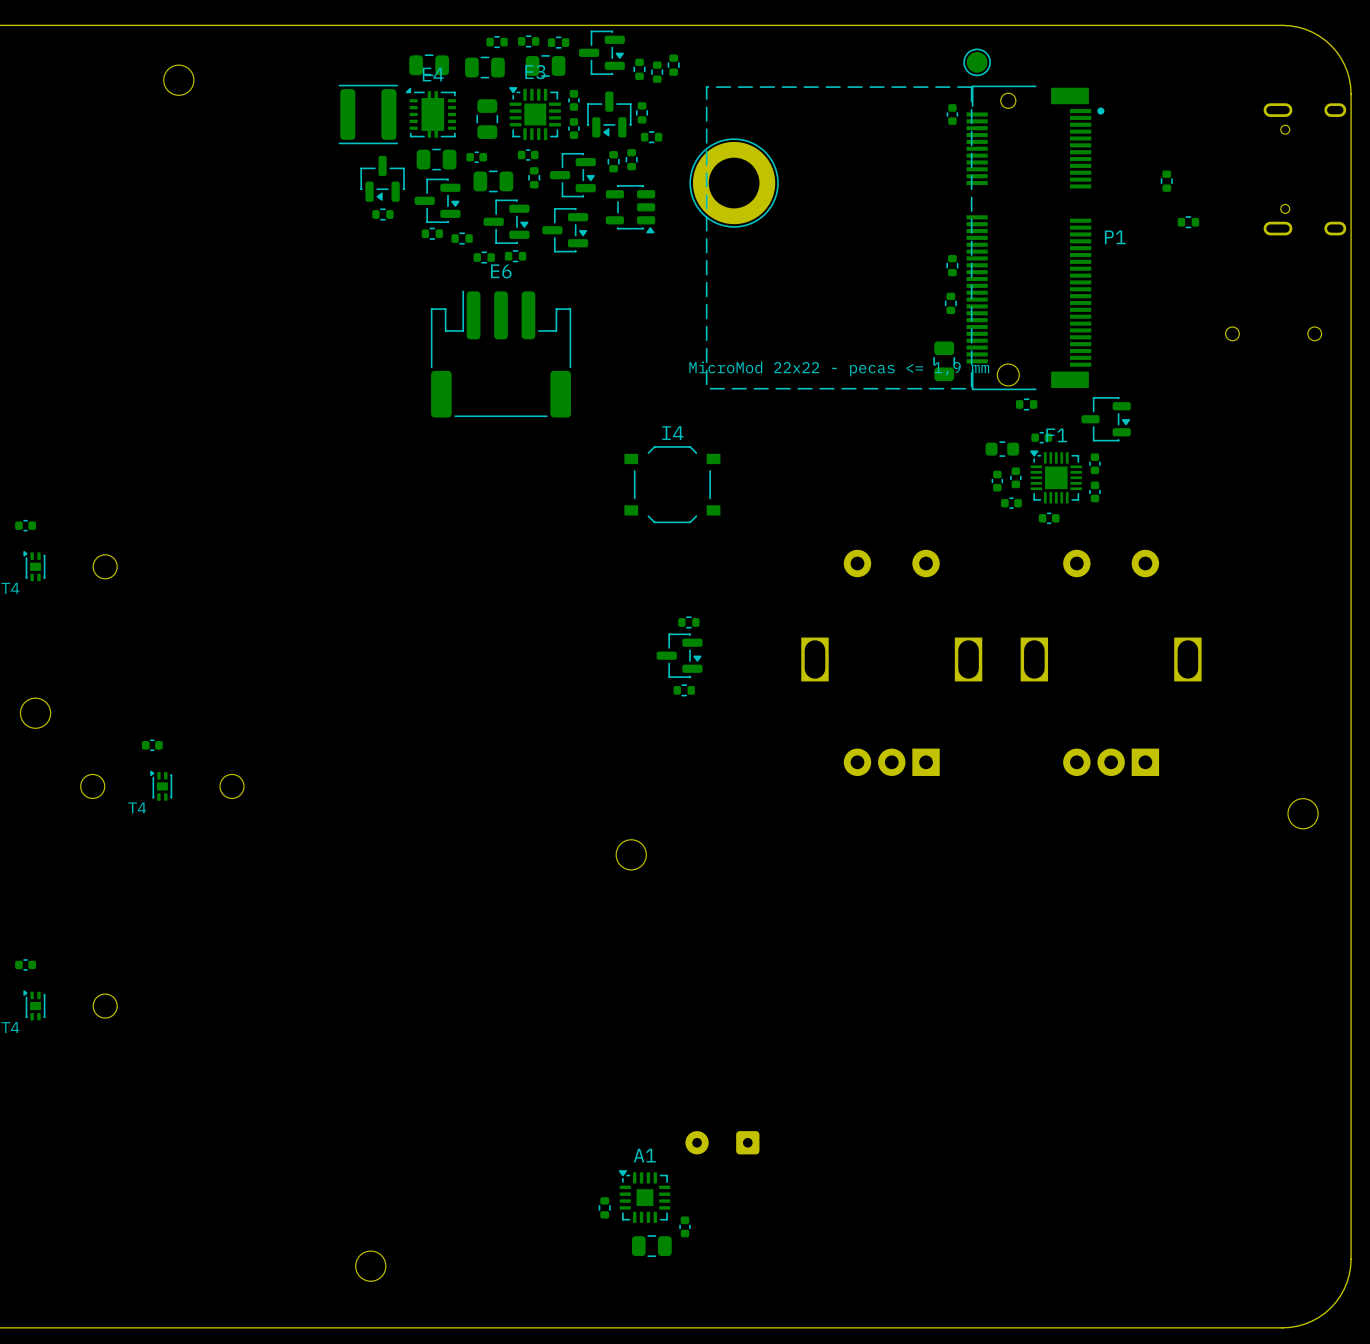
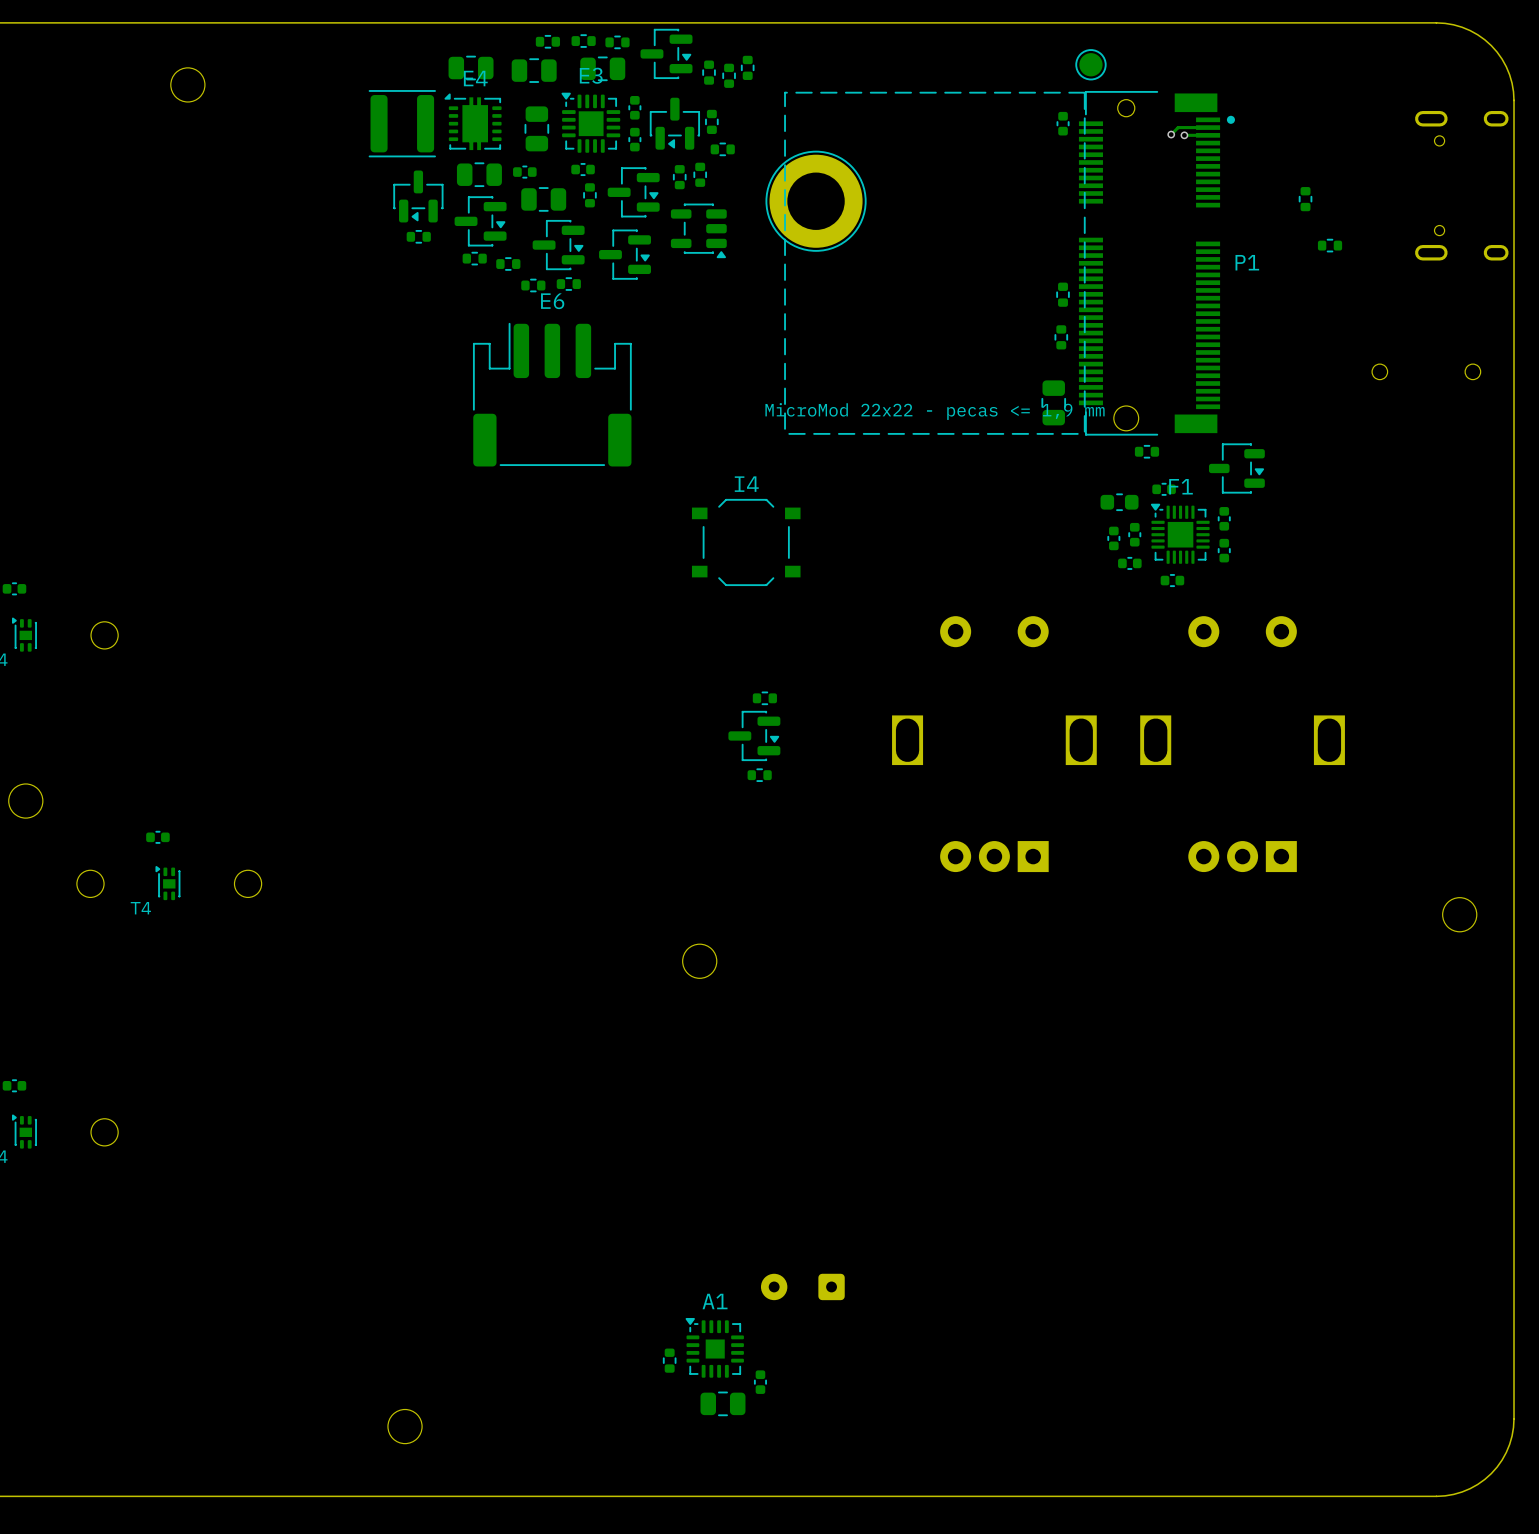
track: none -> (1202, 127) (1178, 127) (1171, 134)
via: none -> (1171, 134)
via: none -> (1184, 135)
track: none -> (1202, 135) (1184, 135)

